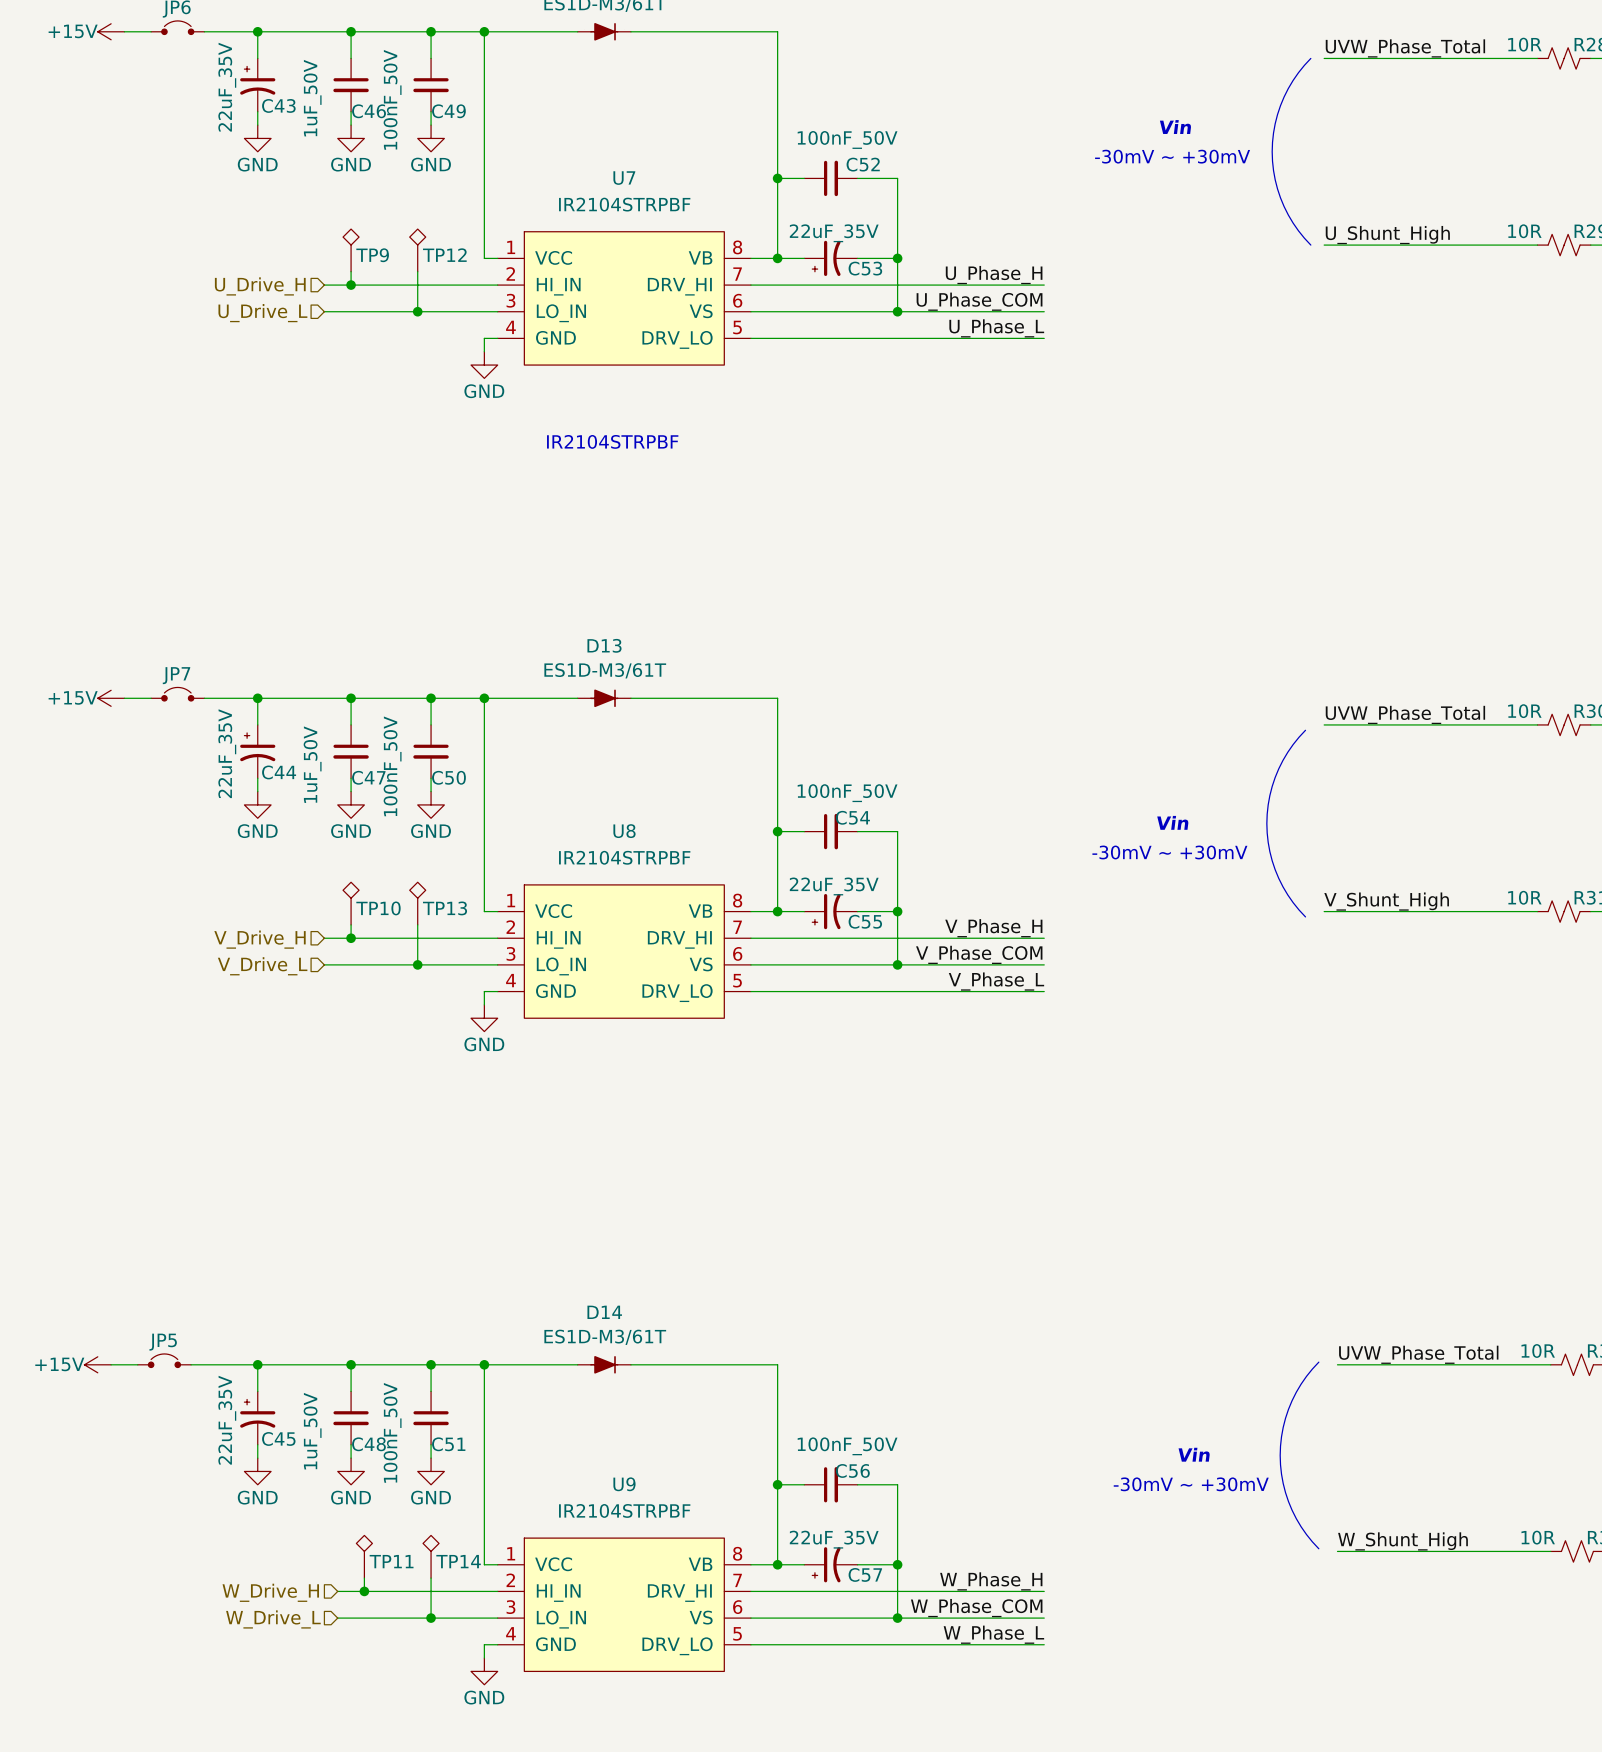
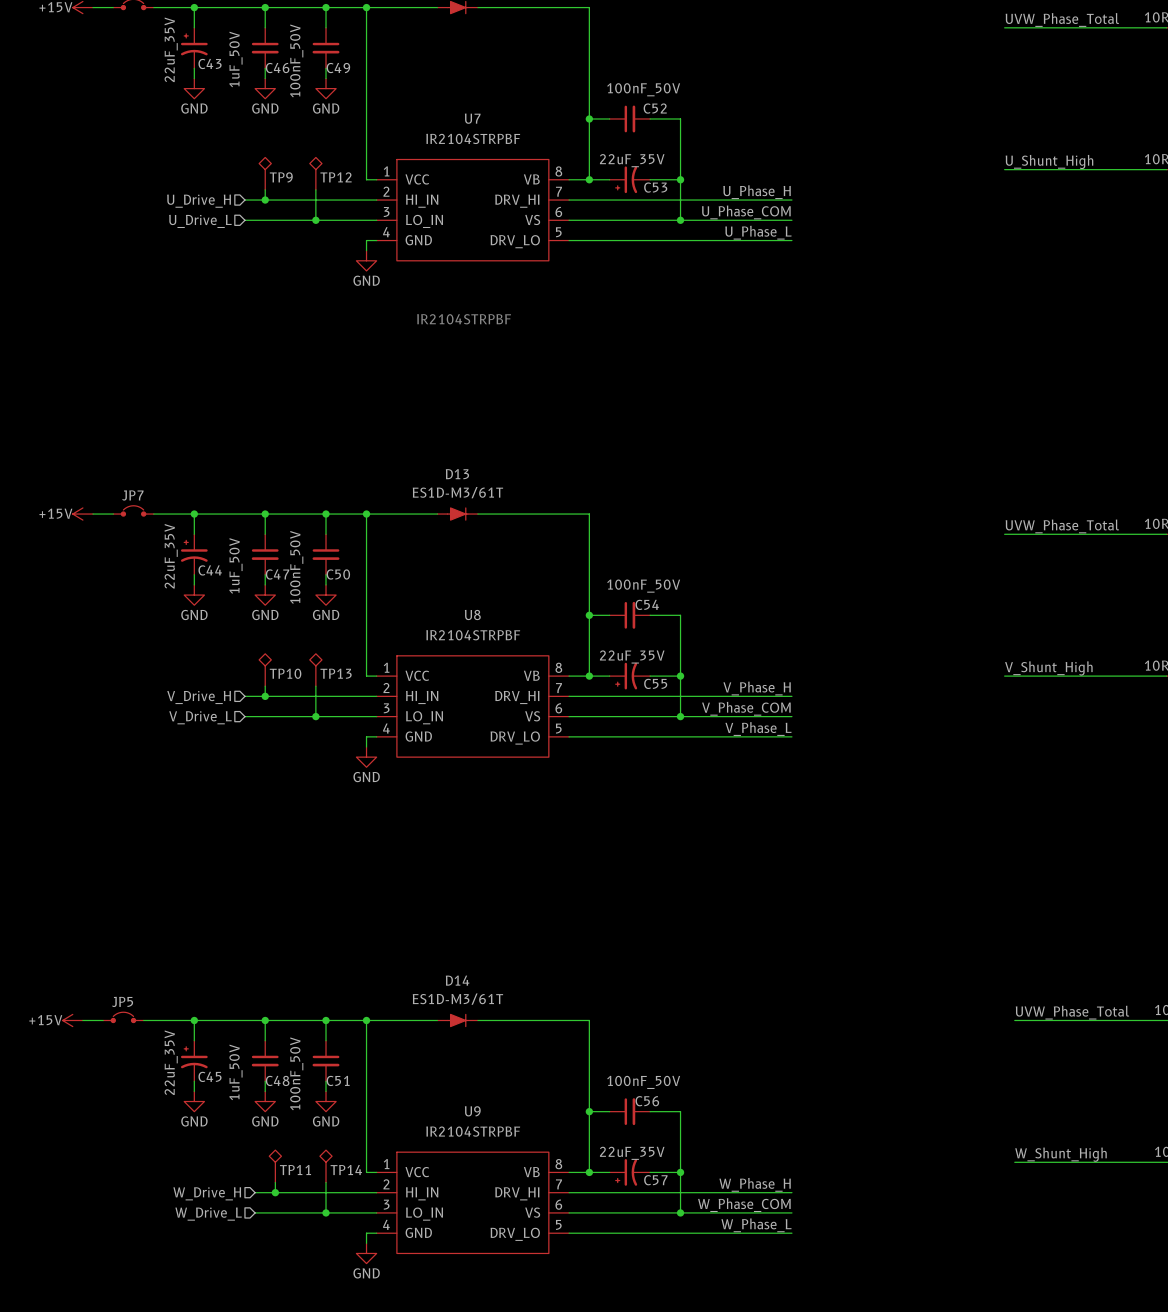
line: (1310, 58) (1293, 80) (1280, 105) (1273, 132) (1272, 151) (1273, 170) (1280, 197) (1293, 223) (1310, 245) -> none
text: Vin (1175, 127) -> none
text: -30mV ~ +30mV (1172, 156) -> none
line: (1305, 730) (1293, 744) (1278, 768) (1269, 795) (1266, 823) (1269, 851) (1278, 878) (1293, 902) (1305, 916) -> none
text: Vin (1172, 822) -> none
text: -30mV ~ +30mV (1169, 852) -> none
line: (1318, 1362) (1301, 1384) (1292, 1400) (1283, 1427) (1280, 1455) (1283, 1483) (1292, 1510) (1301, 1526) (1318, 1548) -> none
text: Vin (1194, 1454) -> none
text: -30mV ~ +30mV (1191, 1484) -> none

